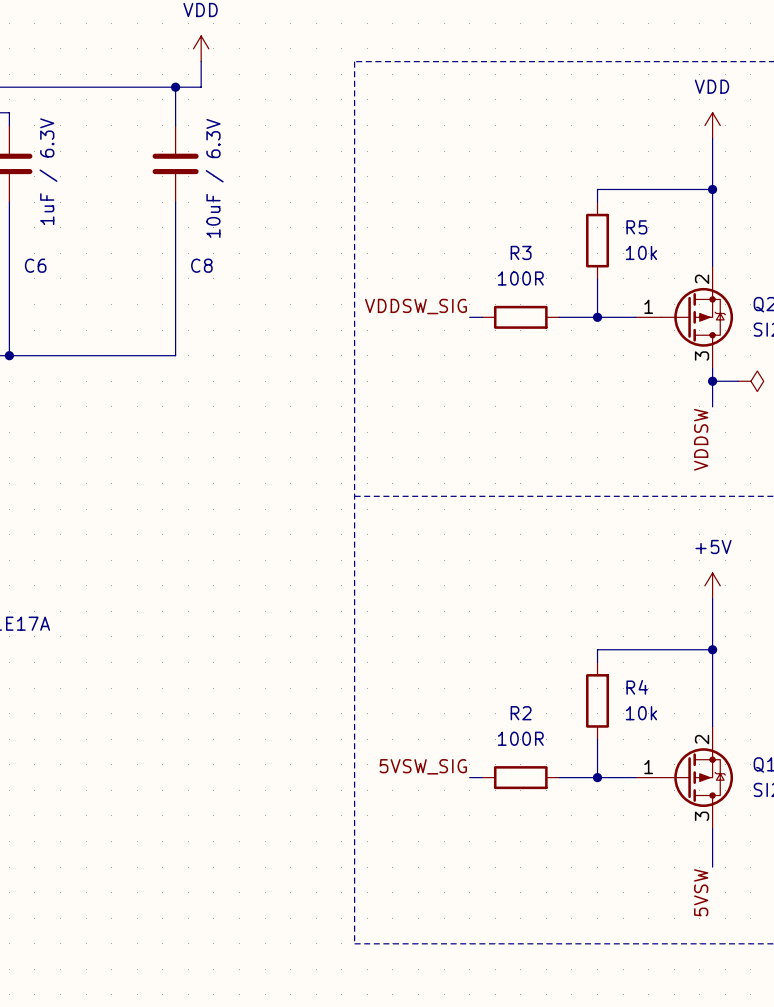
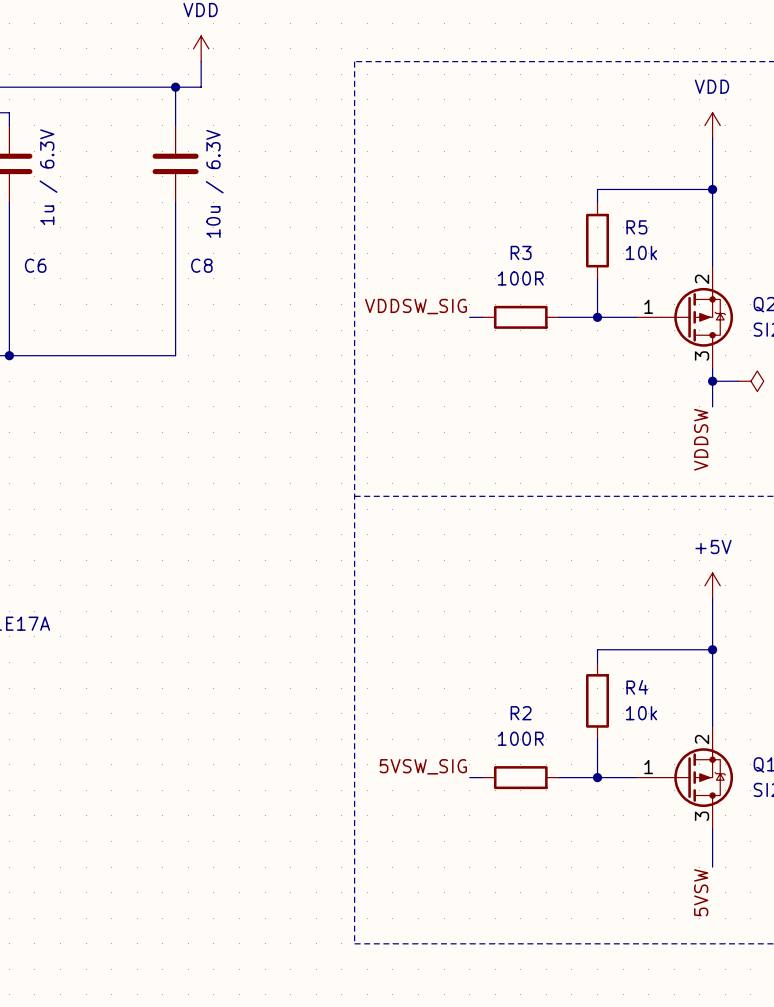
C6 value: 1uF / 6.3V (48, 171) -> 1u / 6.3V (48, 177)
C8 value: 10uF / 6.3V (214, 178) -> 10u / 6.3V (214, 183)

